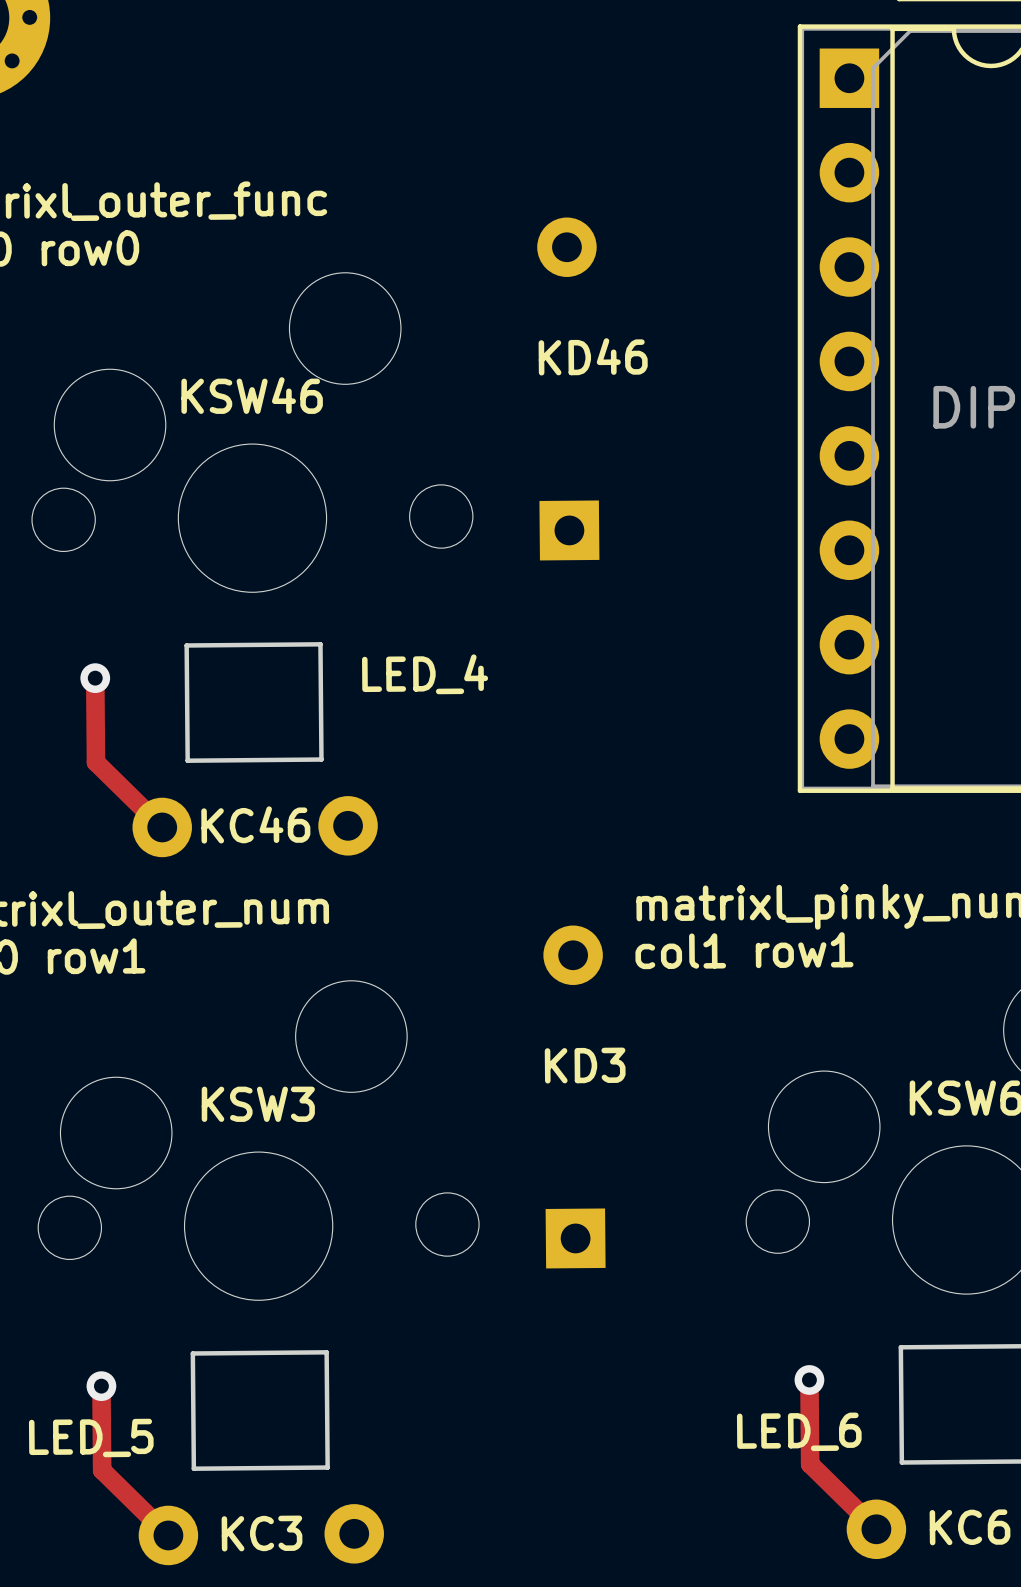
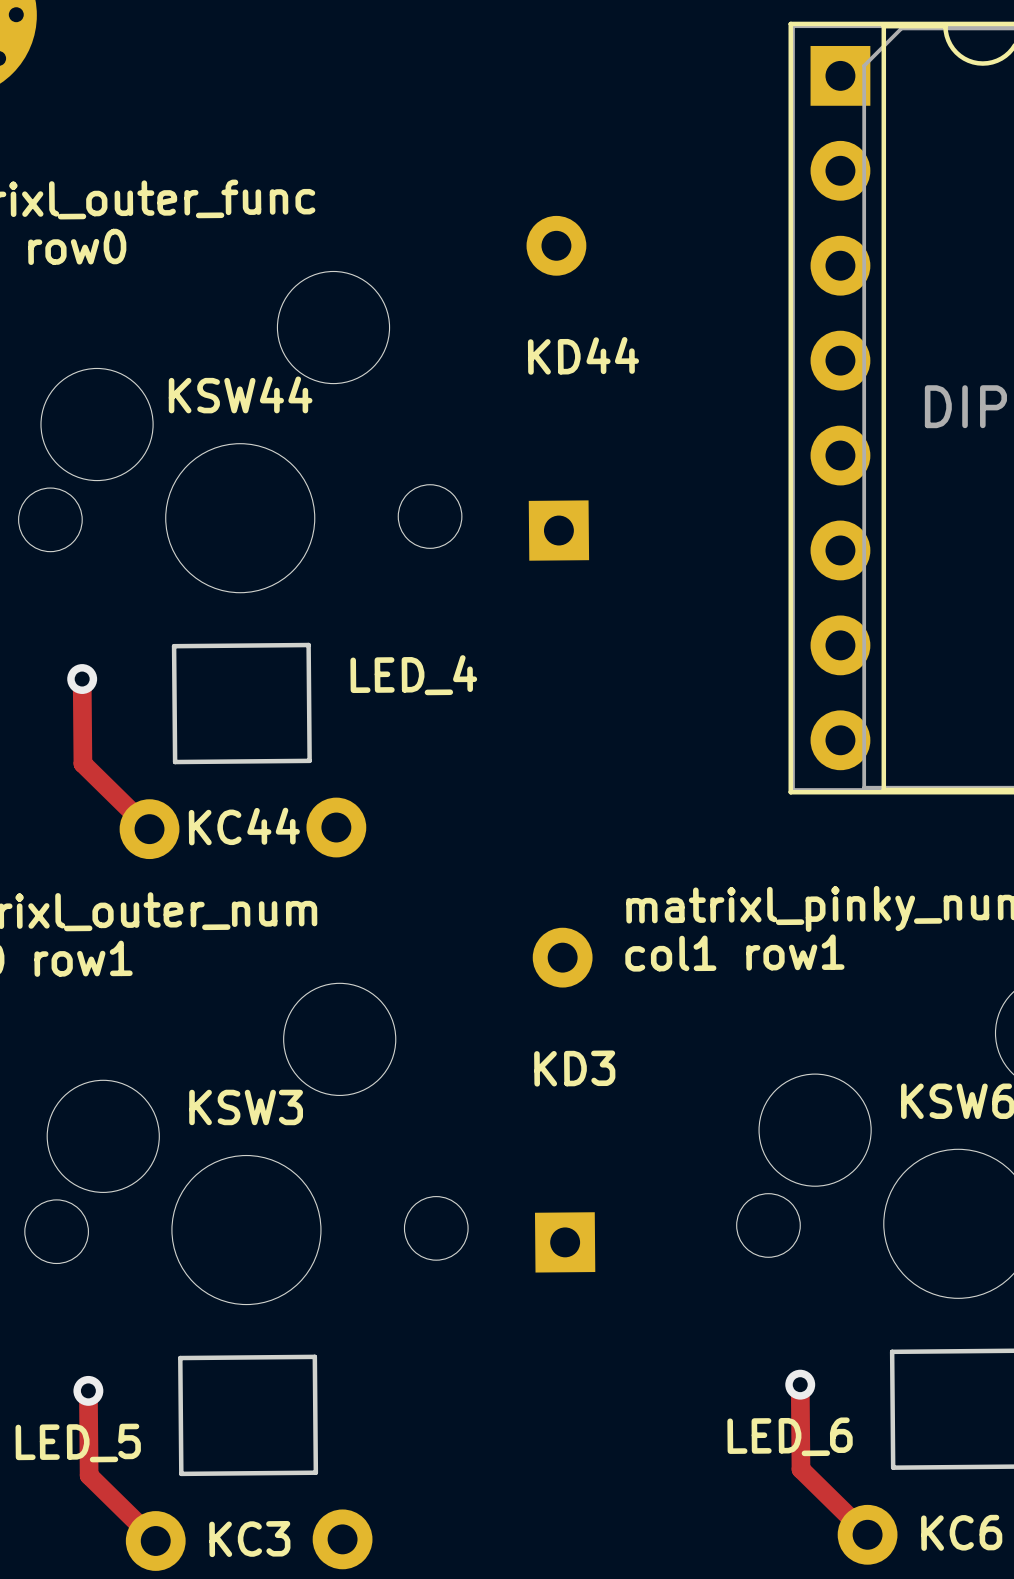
text: KD46 (593, 356) -> KD44 (583, 355)
KSW46 name: KSW46 (252, 395) -> KSW44 (240, 394)
text: KC46 (255, 824) -> KC44 (244, 826)

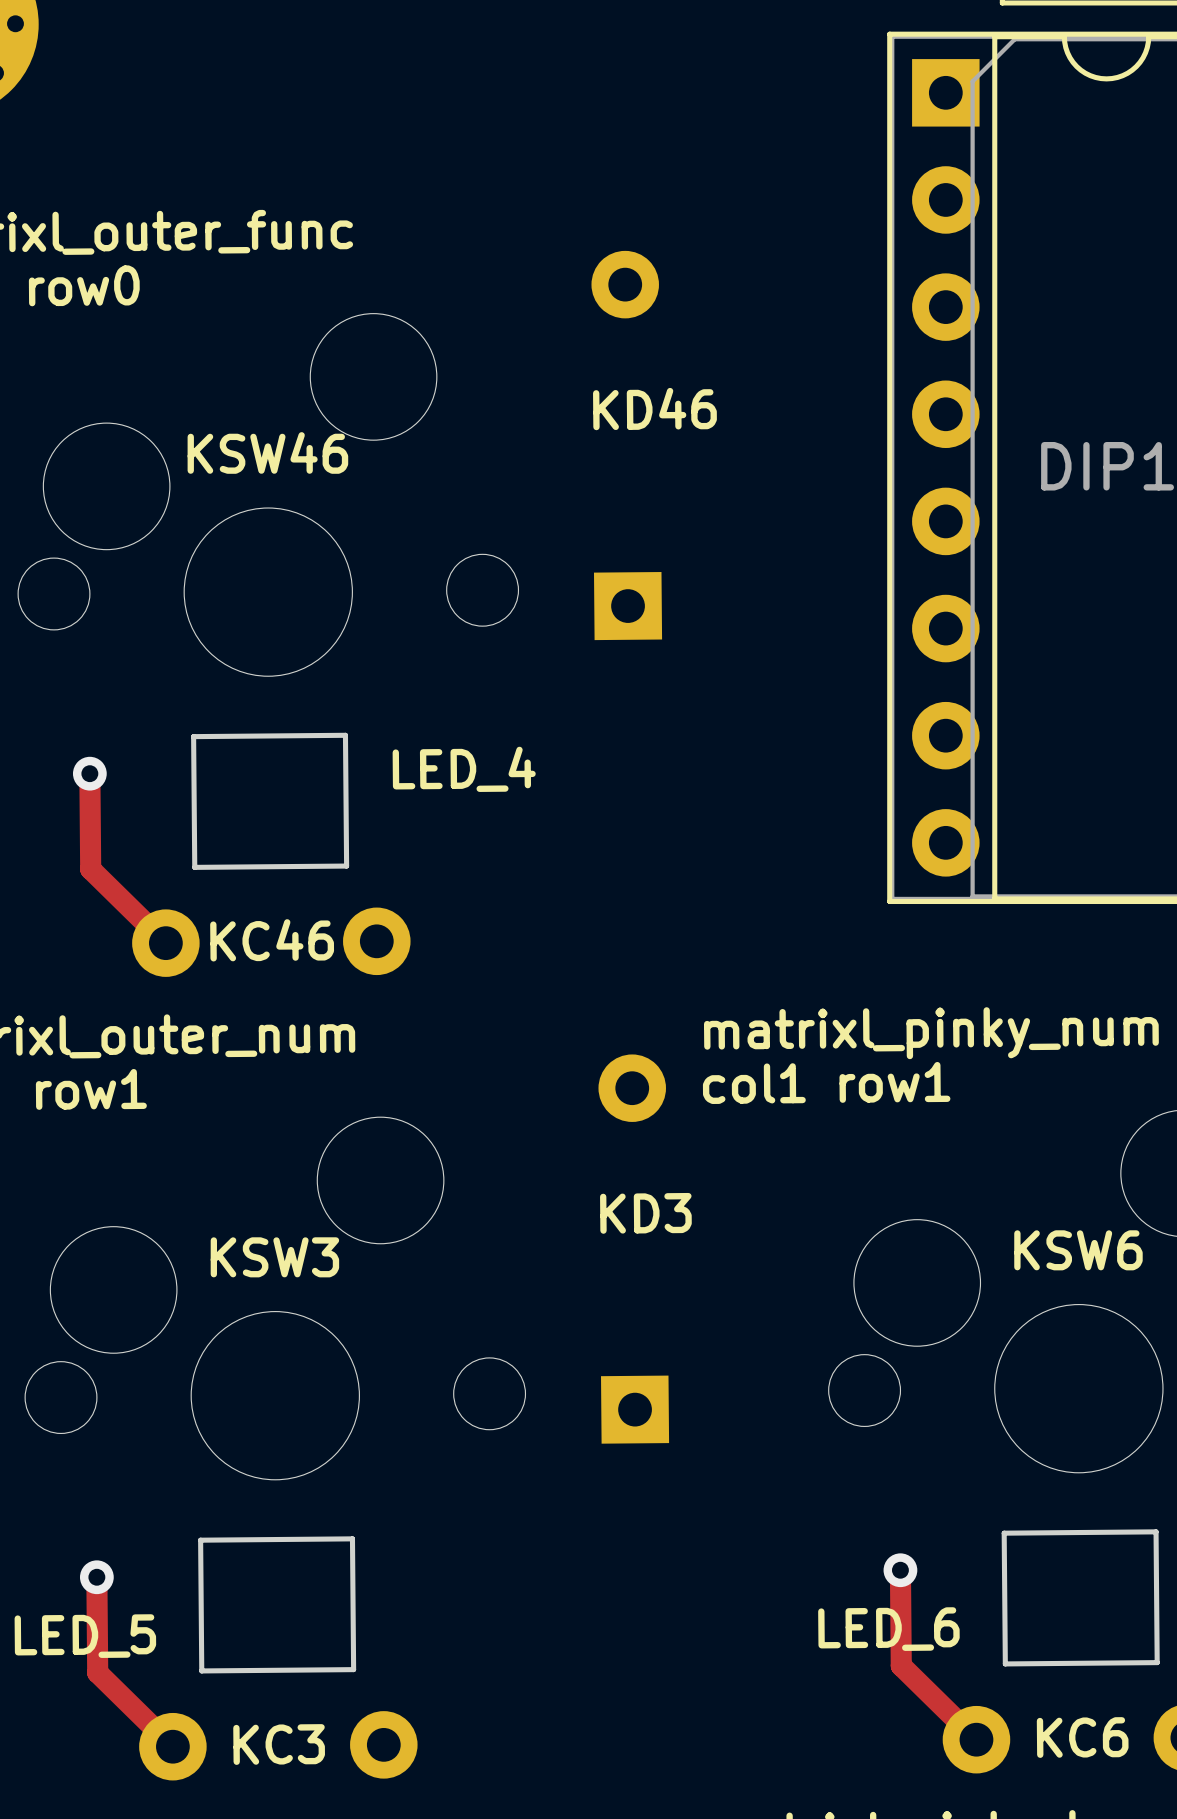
text: KD44 (583, 355) -> KD46 (654, 409)
KSW44 name: KSW44 (240, 394) -> KSW46 (267, 452)
text: KC44 (244, 826) -> KC46 (272, 940)

